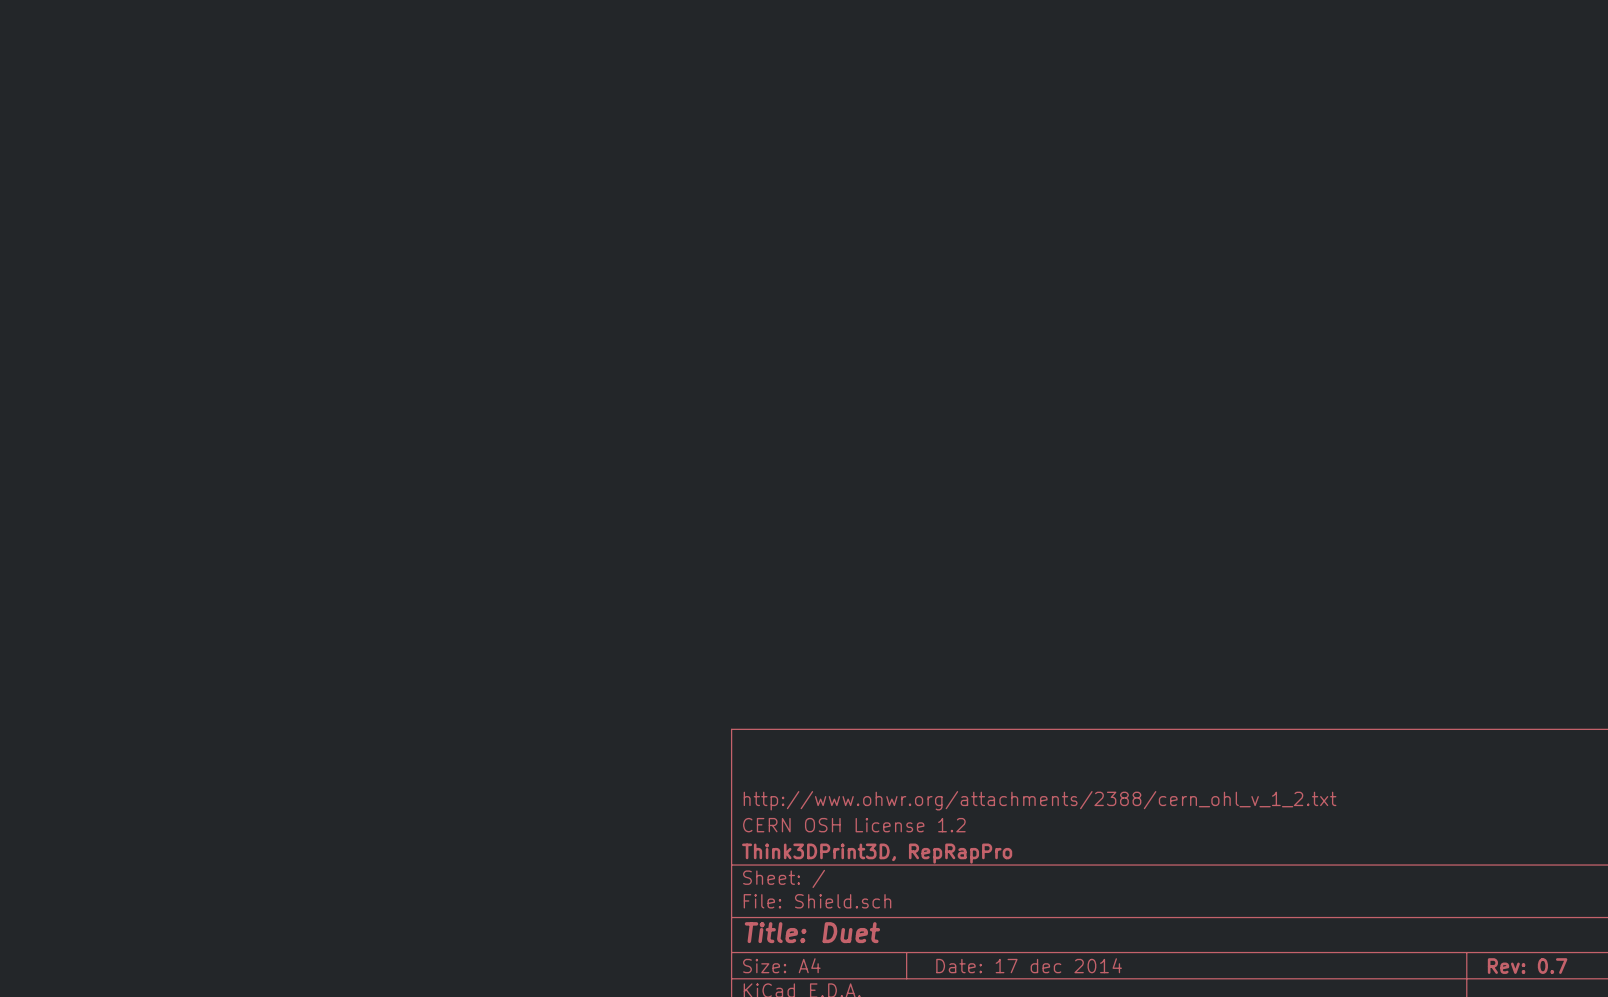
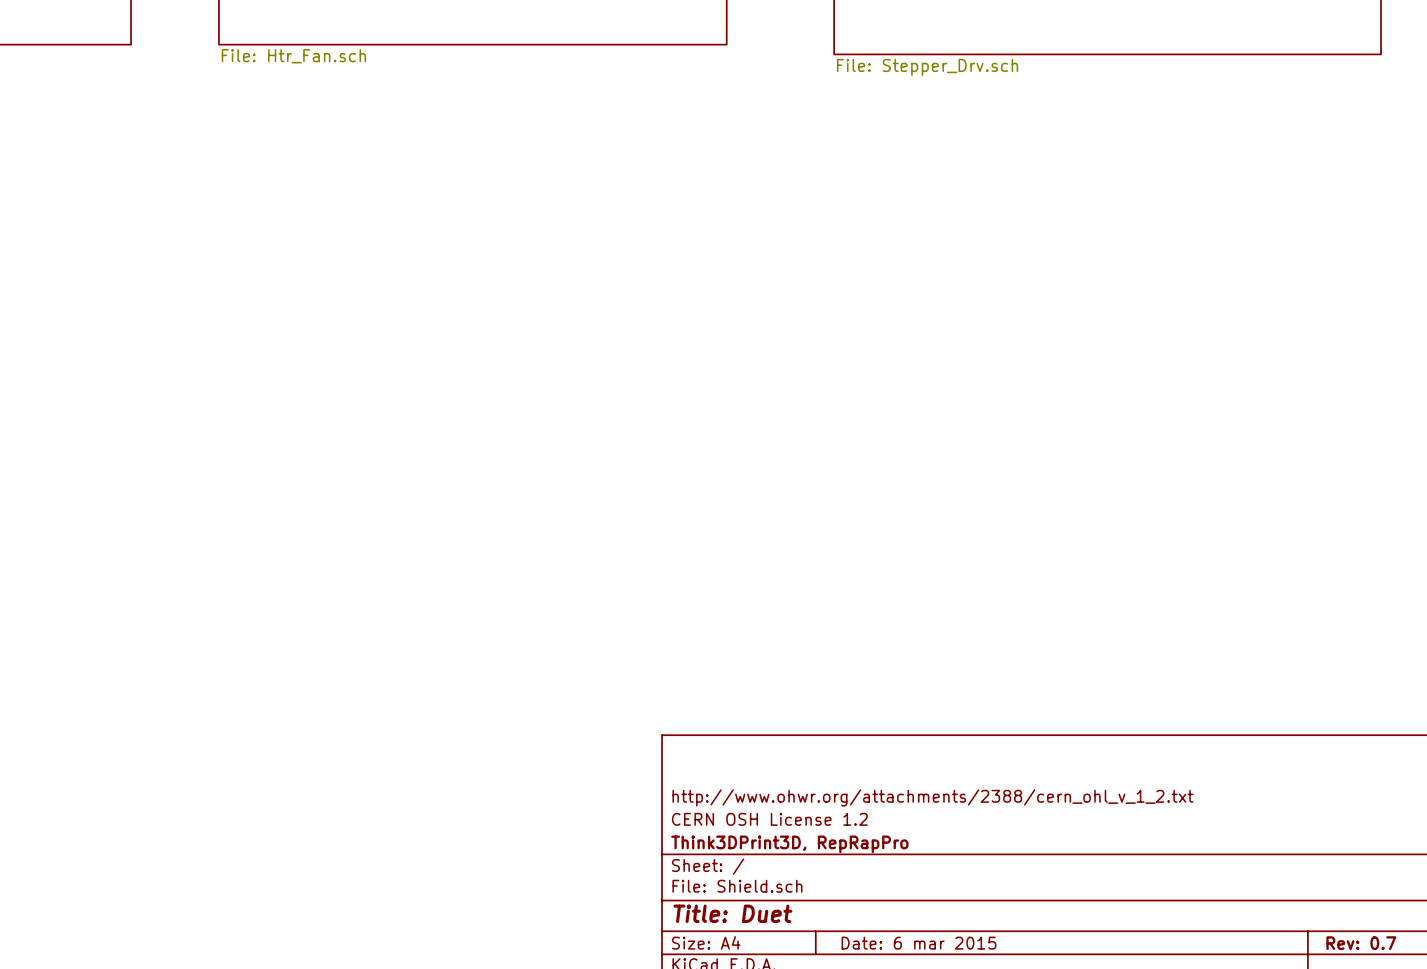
title block: Date: 17 dec 2014 (1029, 965) -> Date: 6 mar 2015 (918, 943)

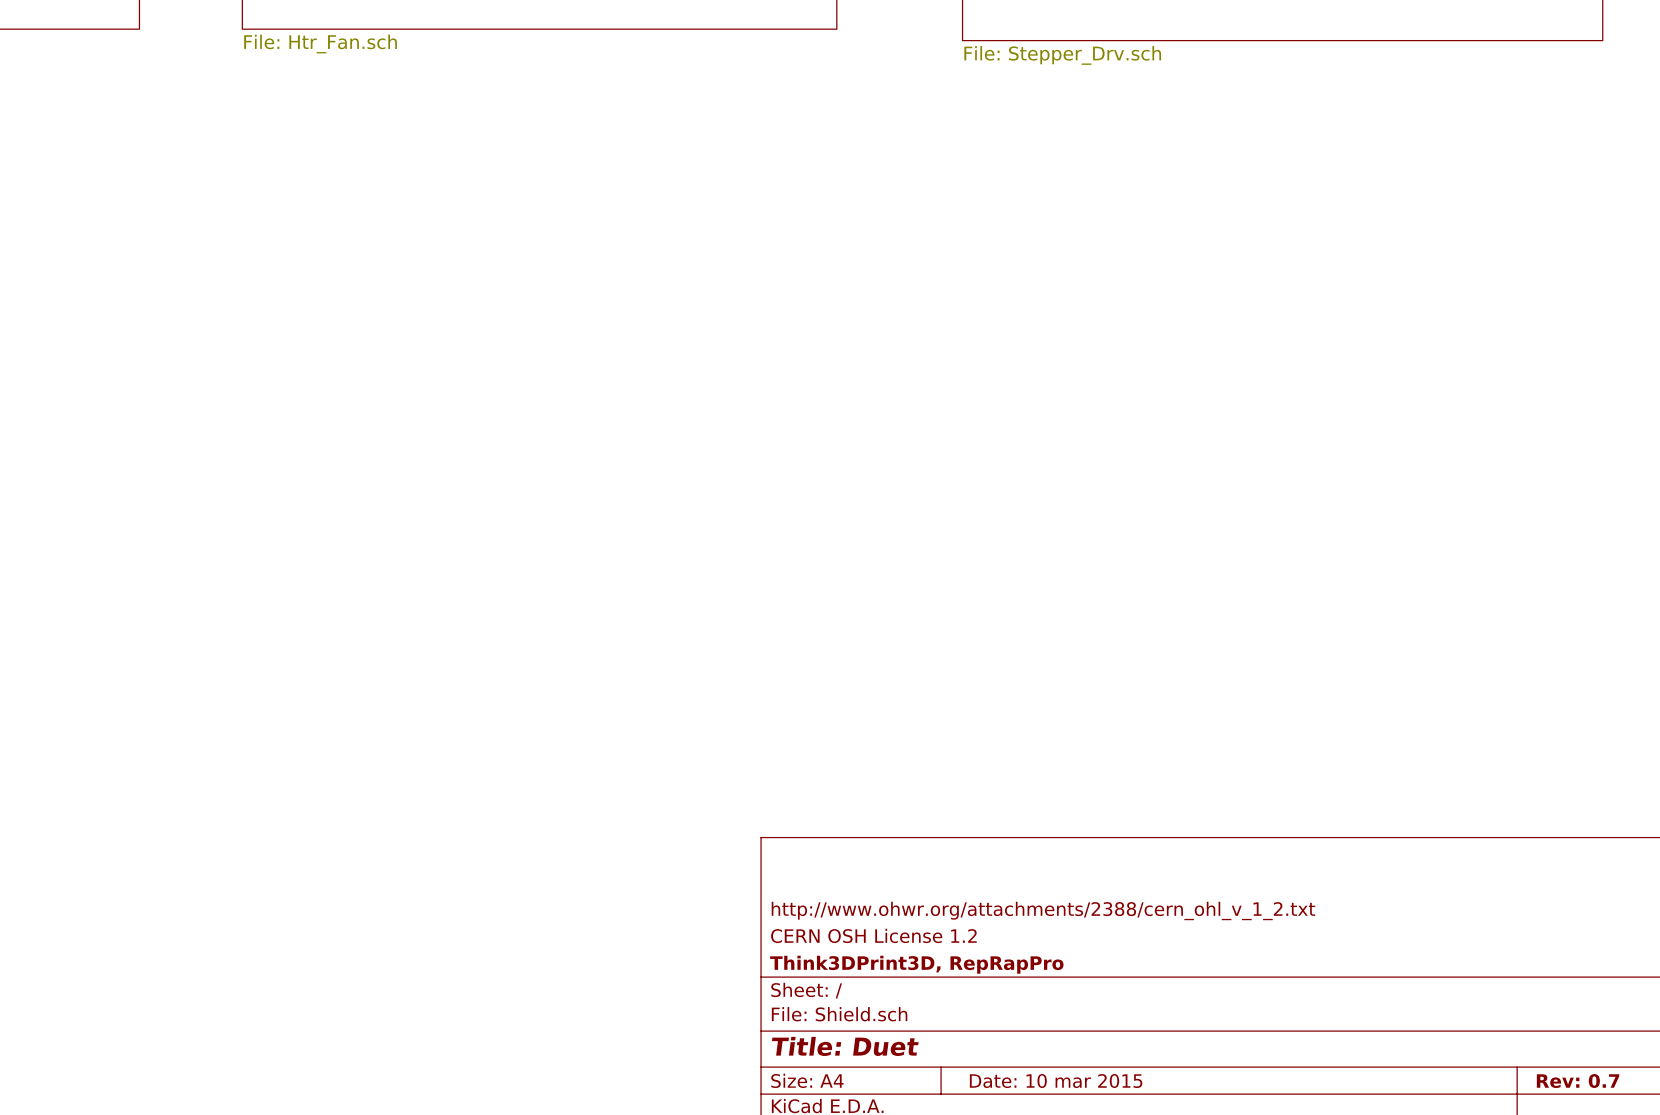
title block: Date: 6 mar 2015 (918, 943) -> Date: 10 mar 2015 (1056, 1081)

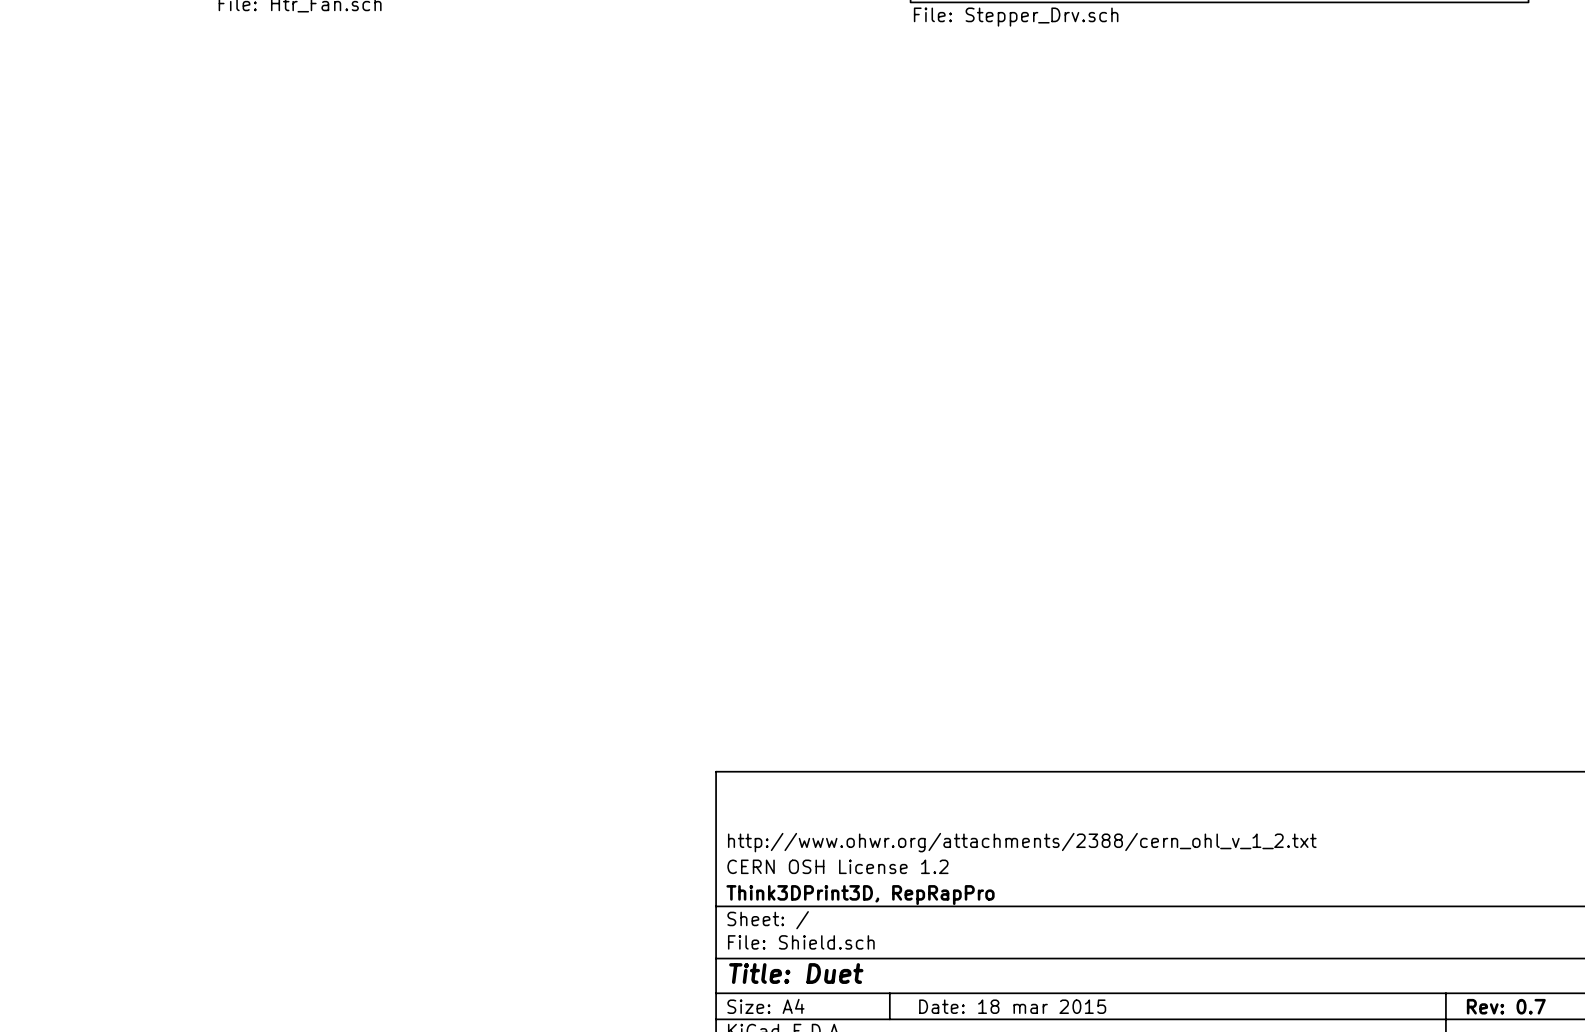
title block: Date: 10 mar 2015 (1056, 1081) -> Date: 18 mar 2015 (1012, 1006)

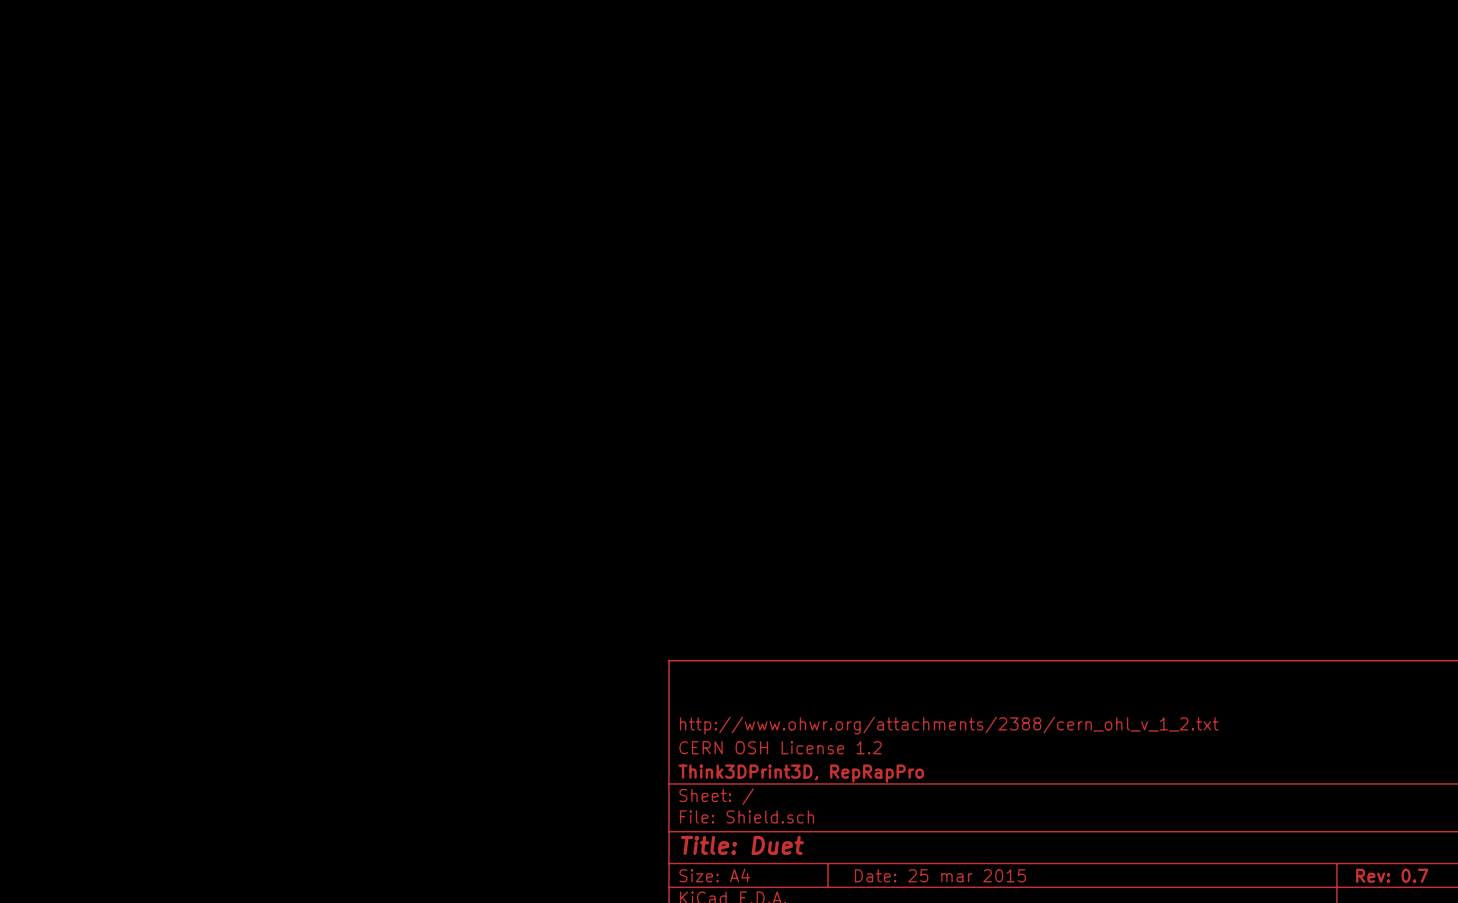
title block: Date: 18 mar 2015 (1012, 1006) -> Date: 25 mar 2015 (940, 875)

